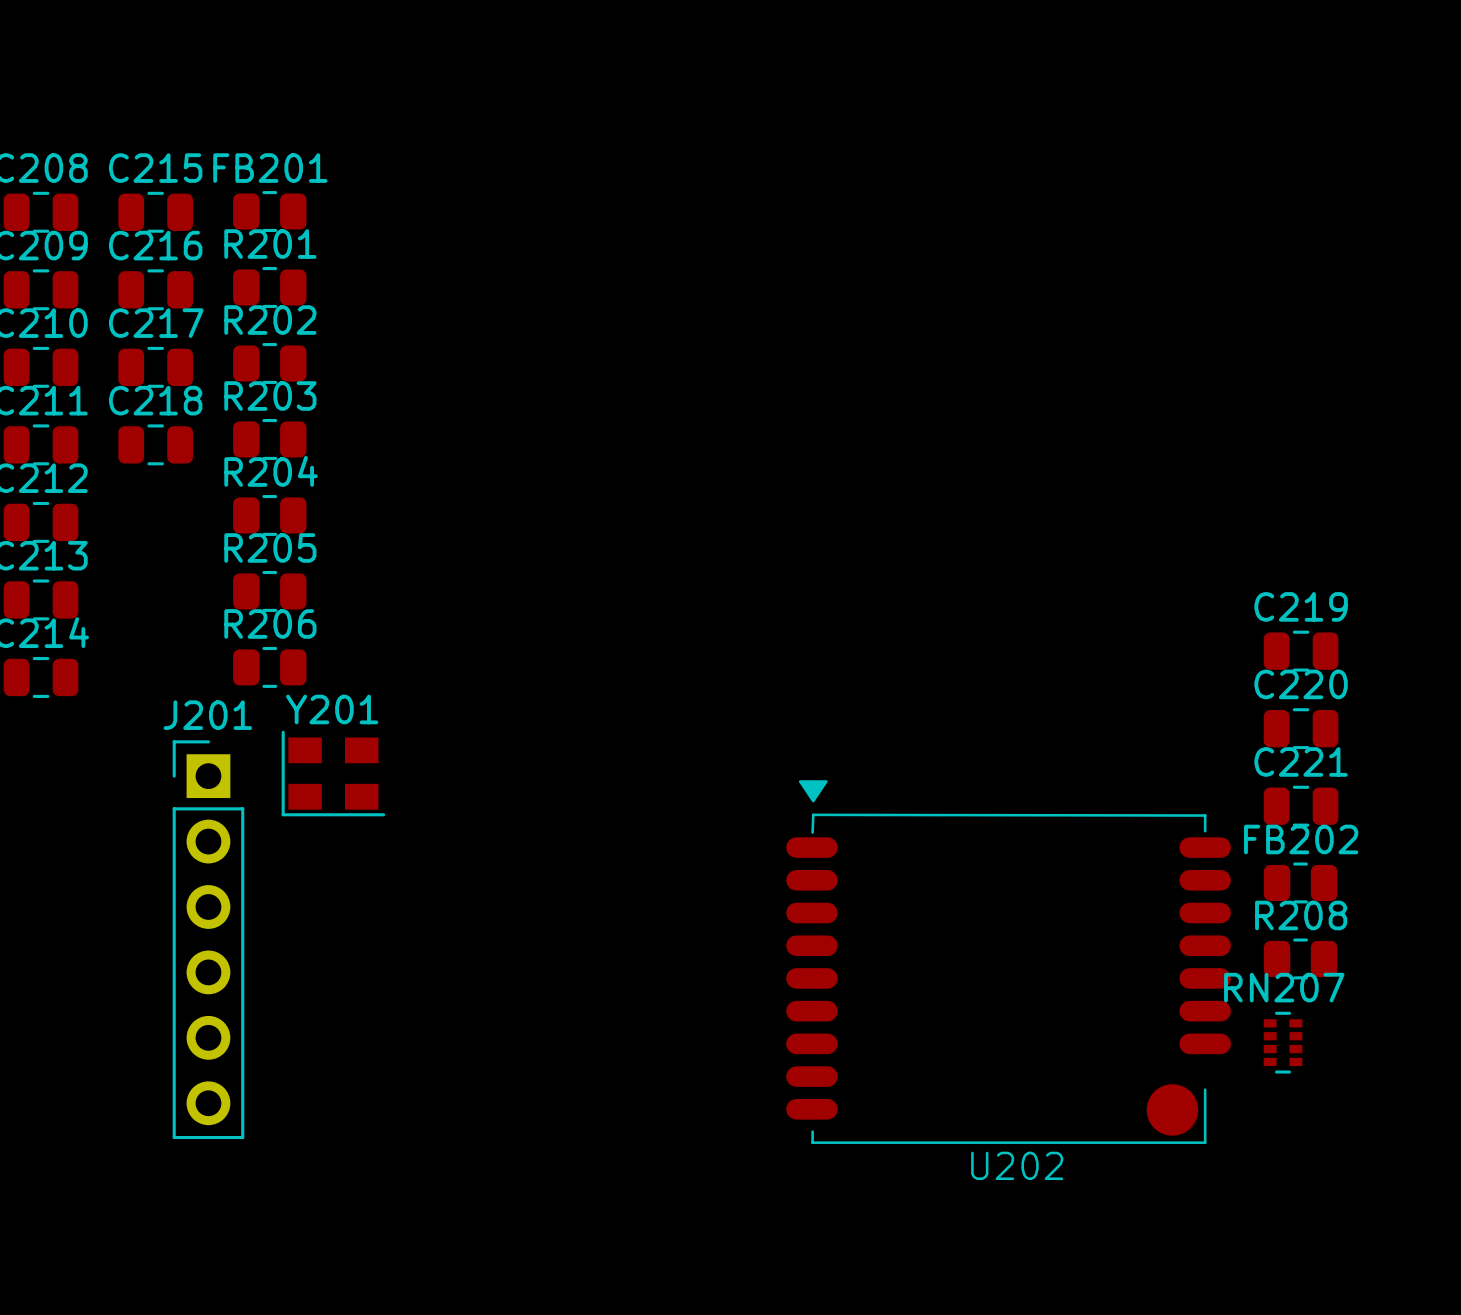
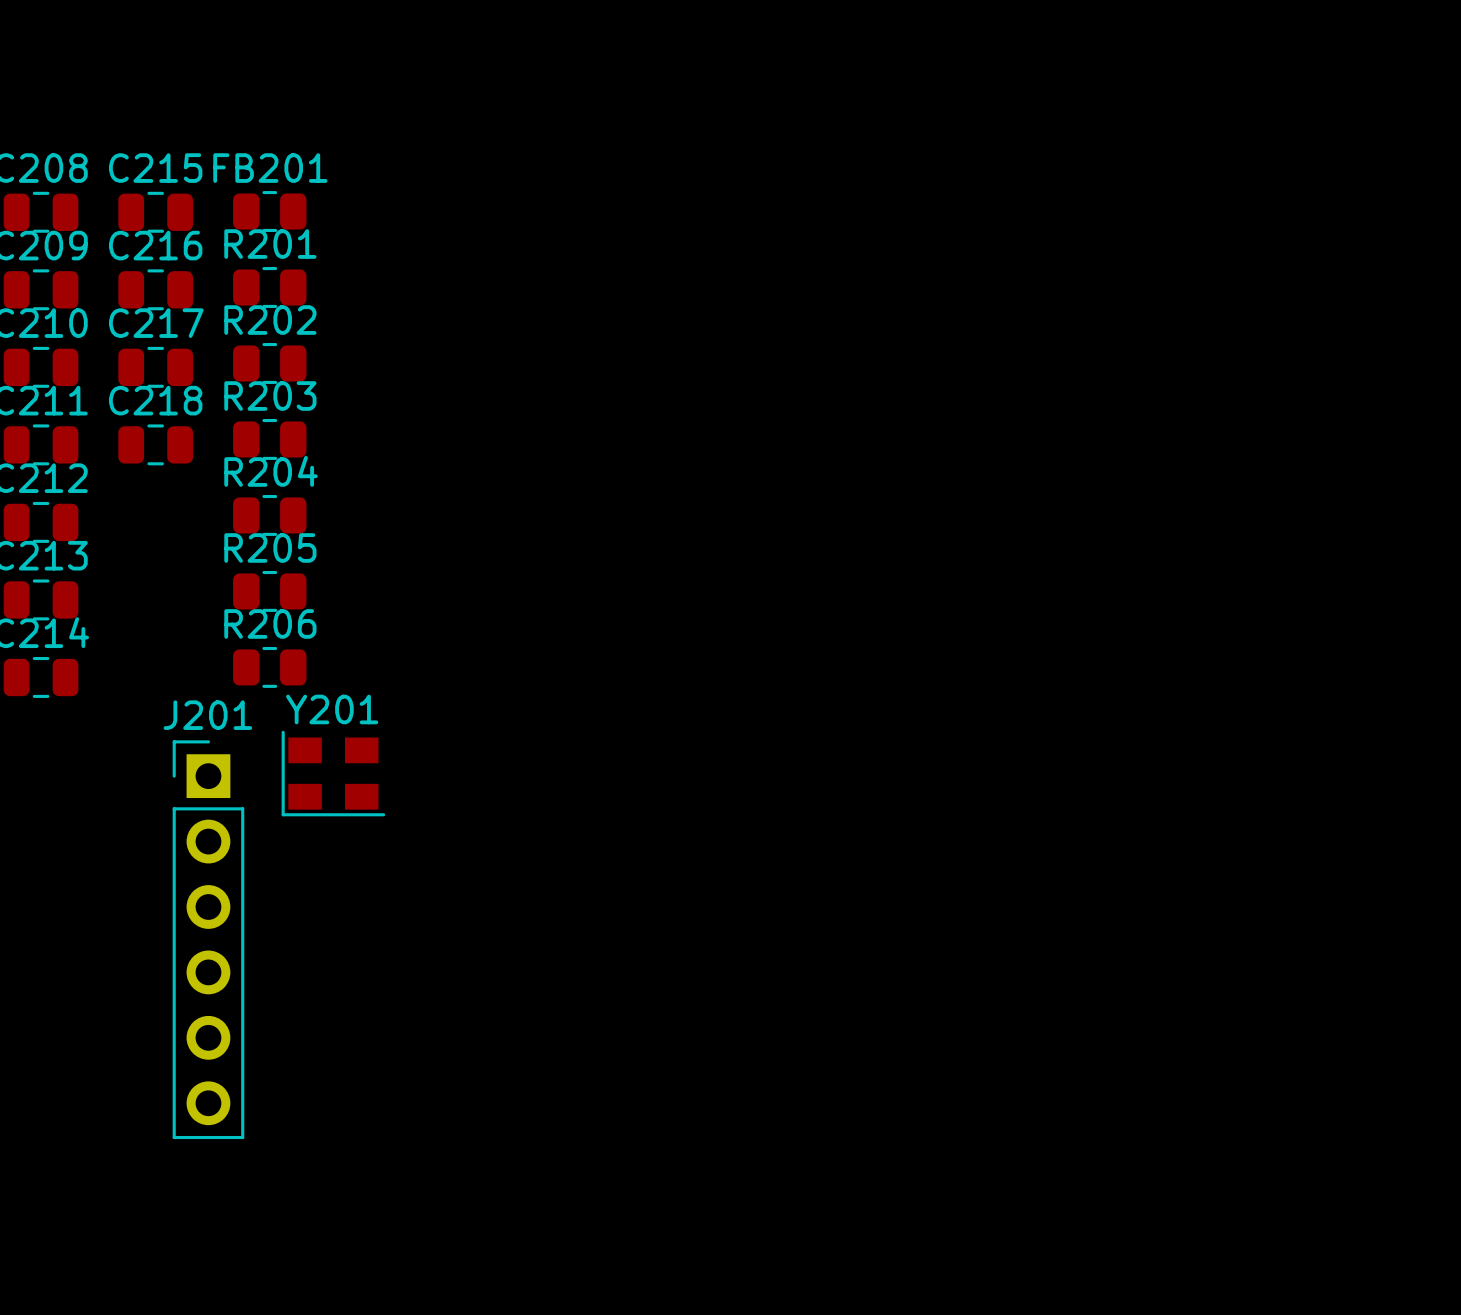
C219: (1301, 651) -> none
C220: (1301, 728) -> none
C221: (1301, 806) -> none
FB202: (1300, 882) -> none
R208: (1300, 958) -> none
U202: (1008, 962) -> none
RN207: (1283, 1042) -> none

